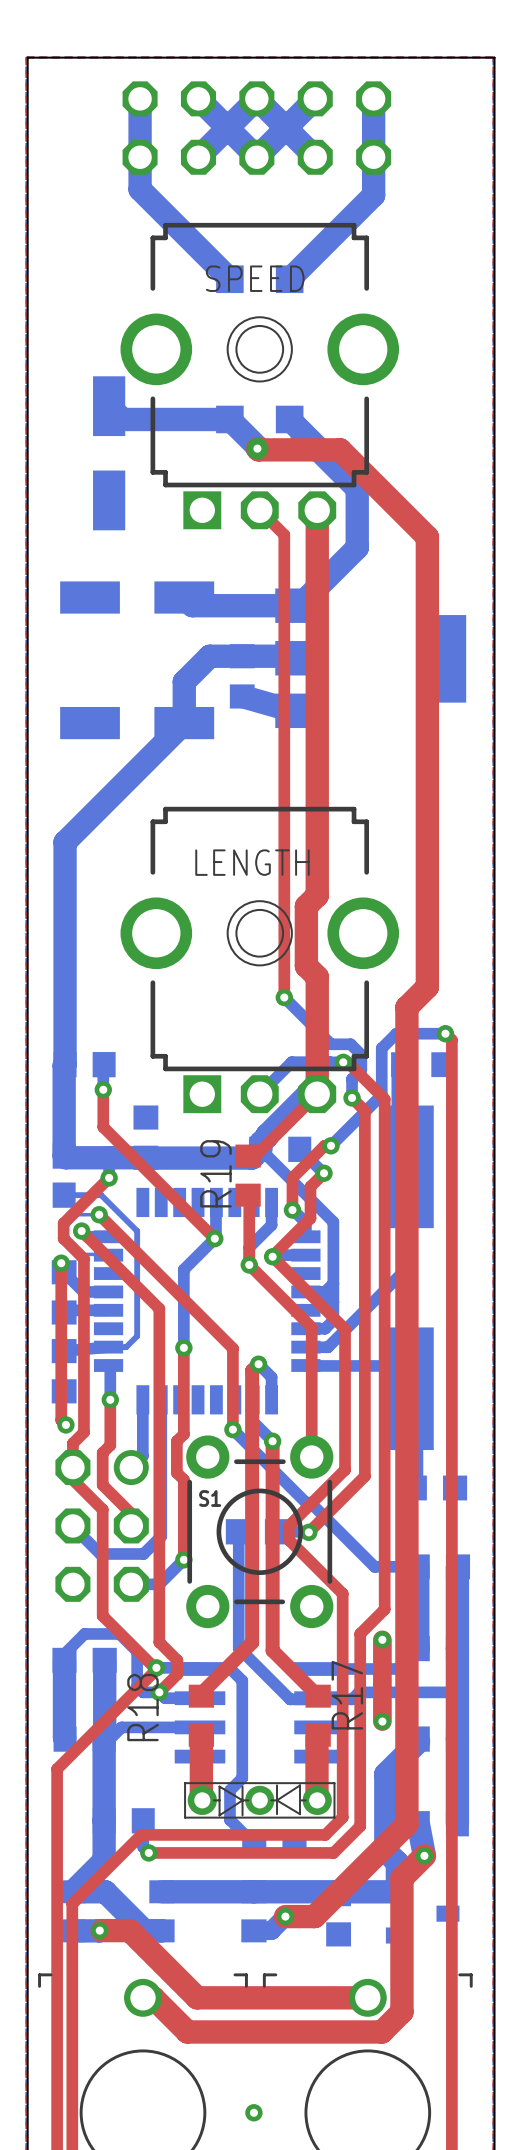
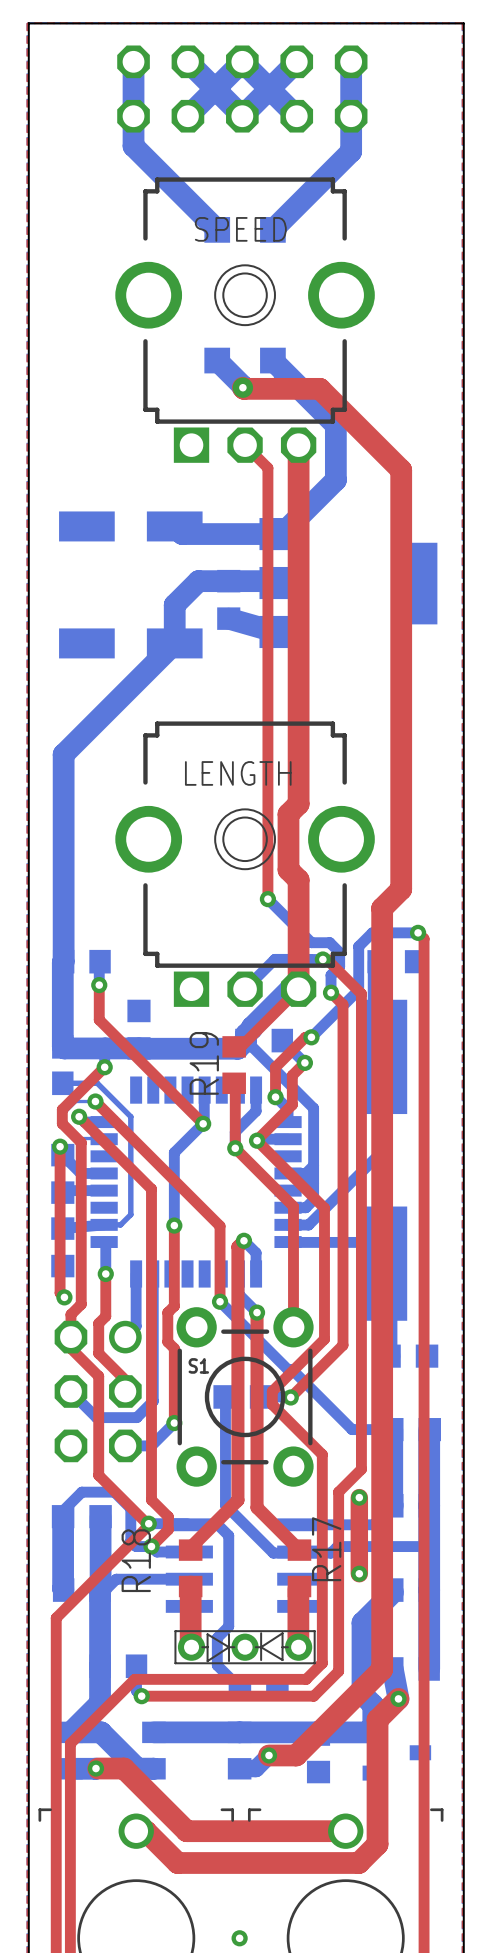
bottom track: (109, 406) (122, 419) (229, 419) -> none
part: (109, 453) -> none

